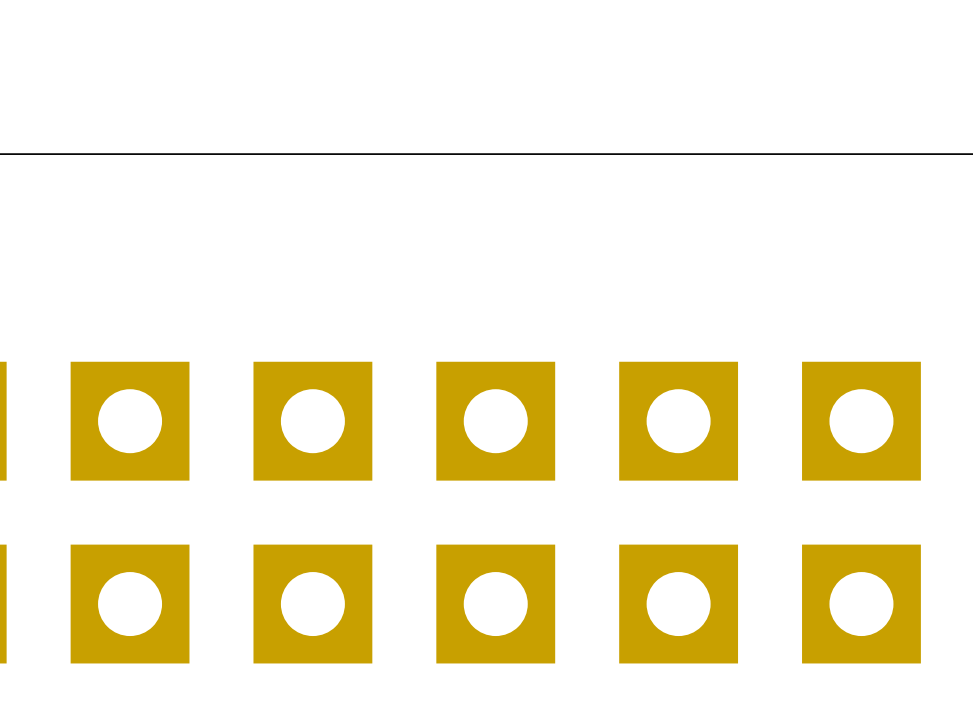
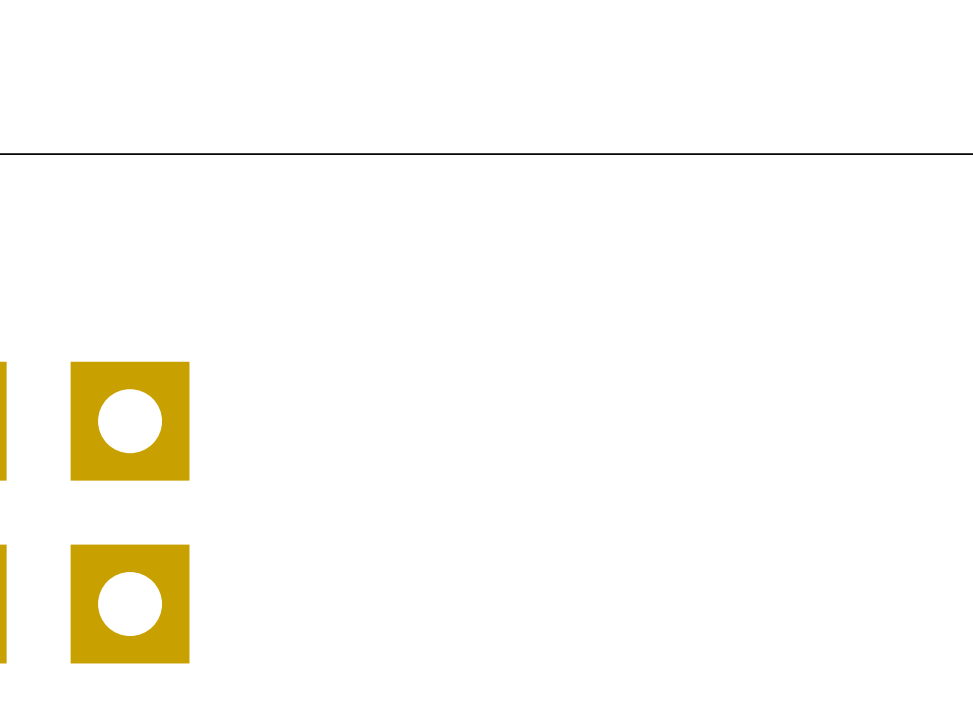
part: (587, 512) -> none

